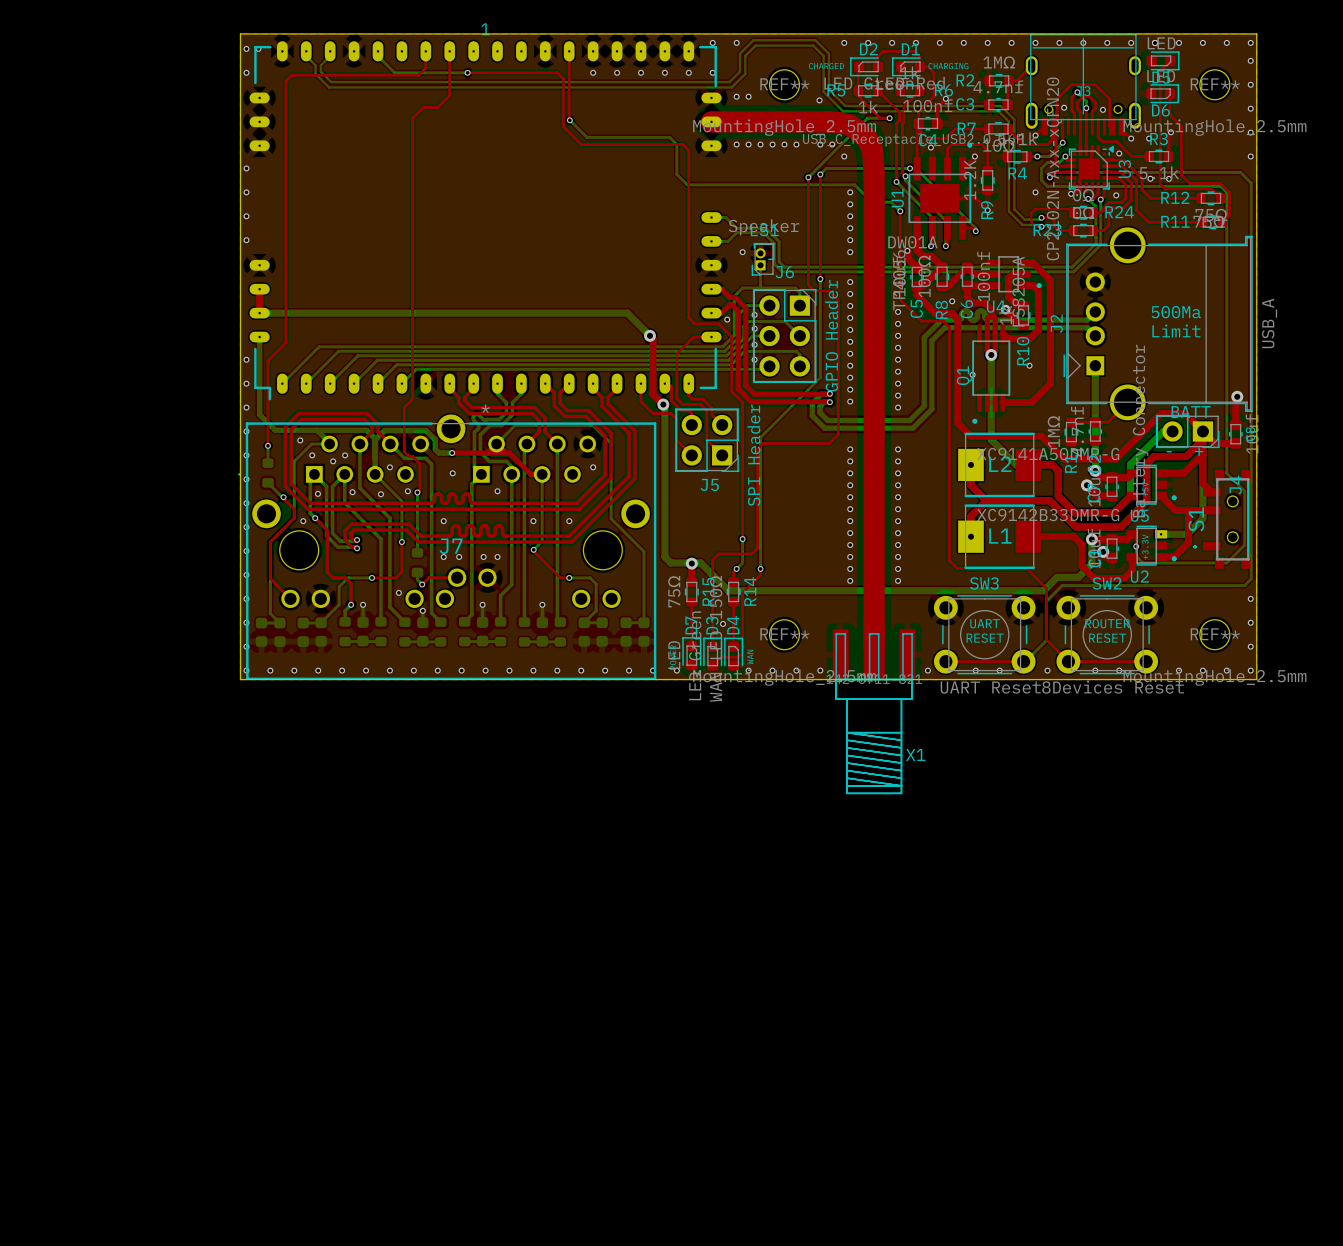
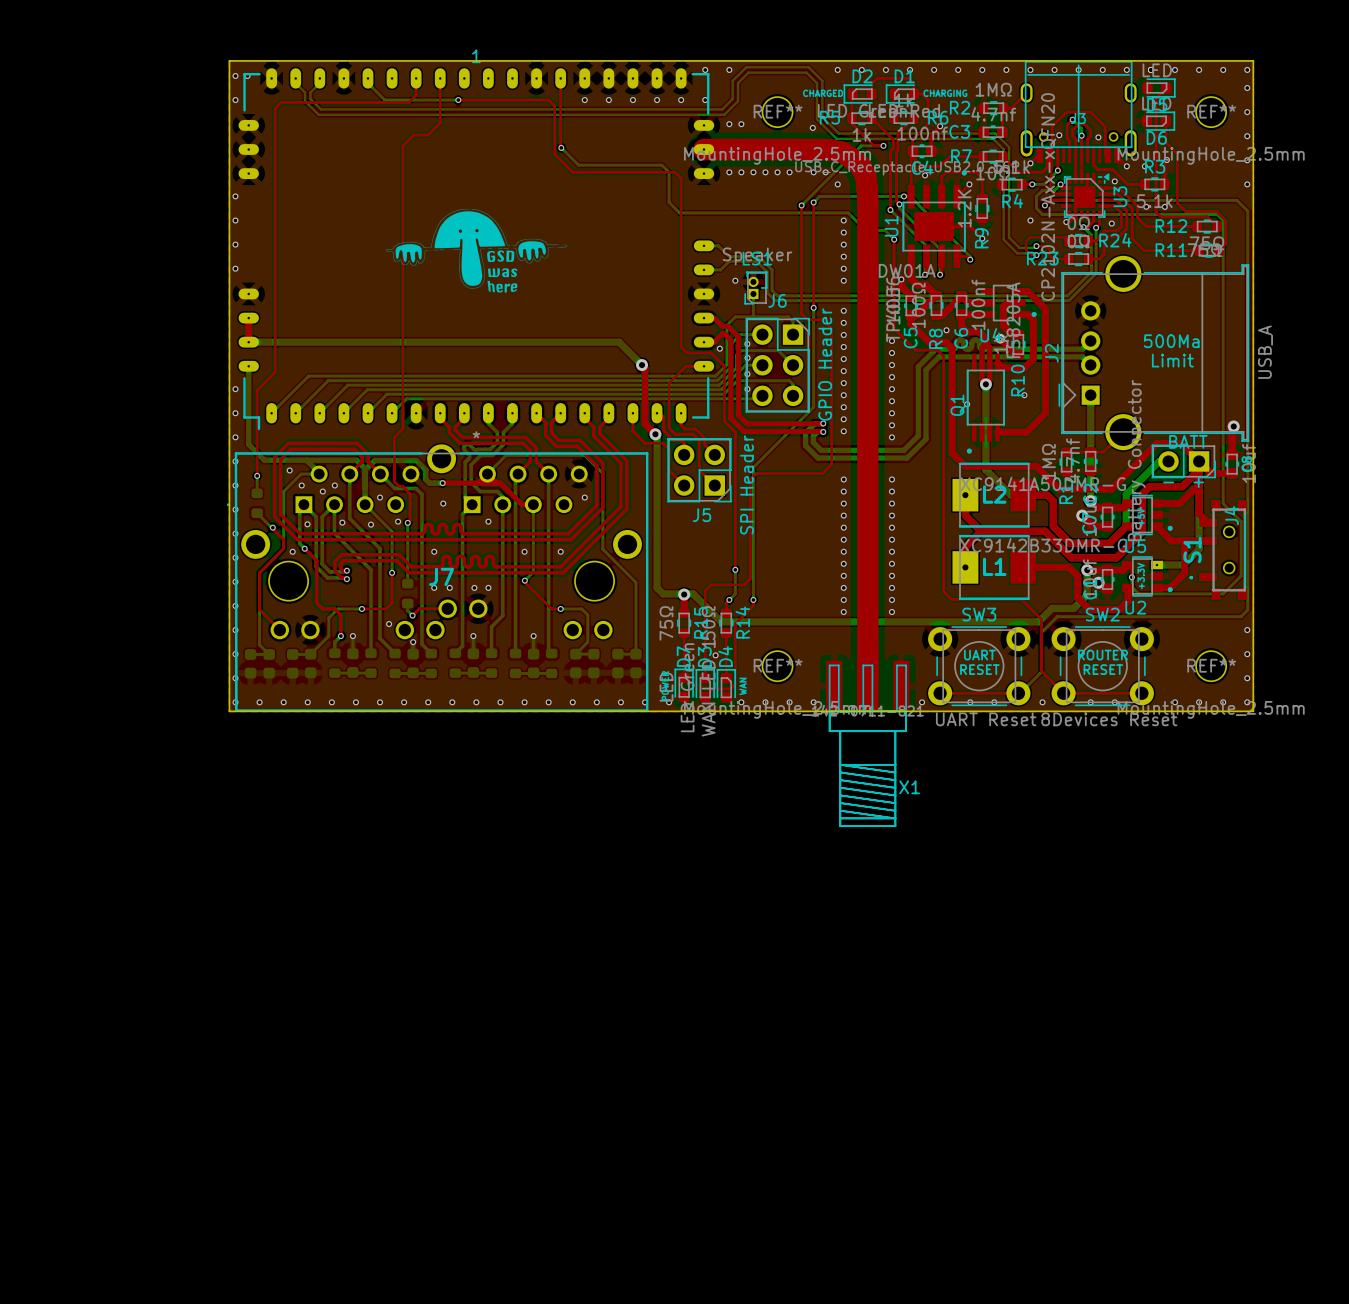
drawing: none -> [386, 208, 567, 293]

